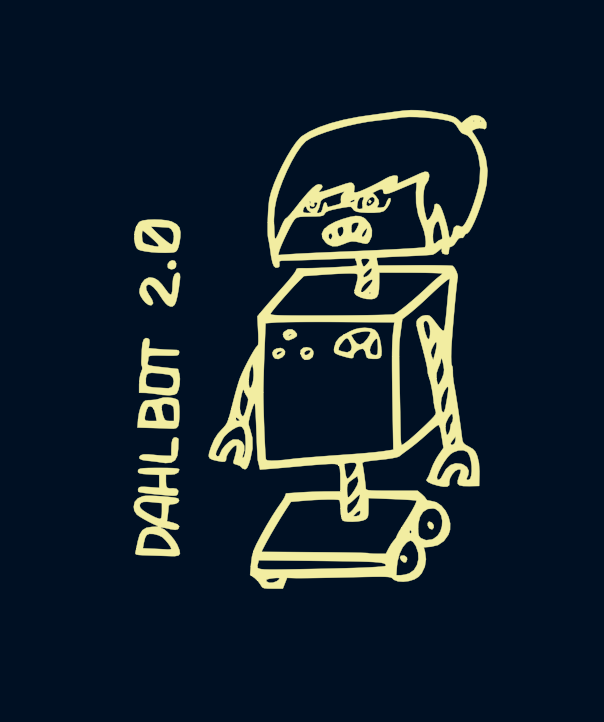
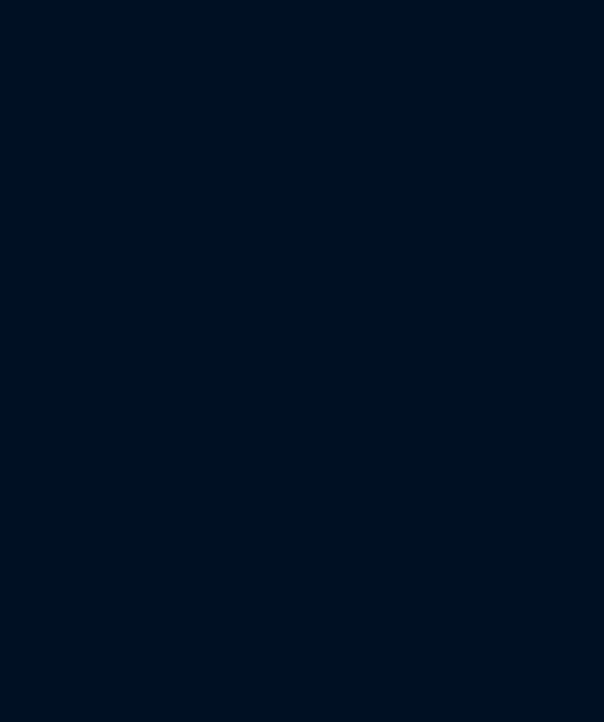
drawing: [133, 109, 488, 589] -> none

